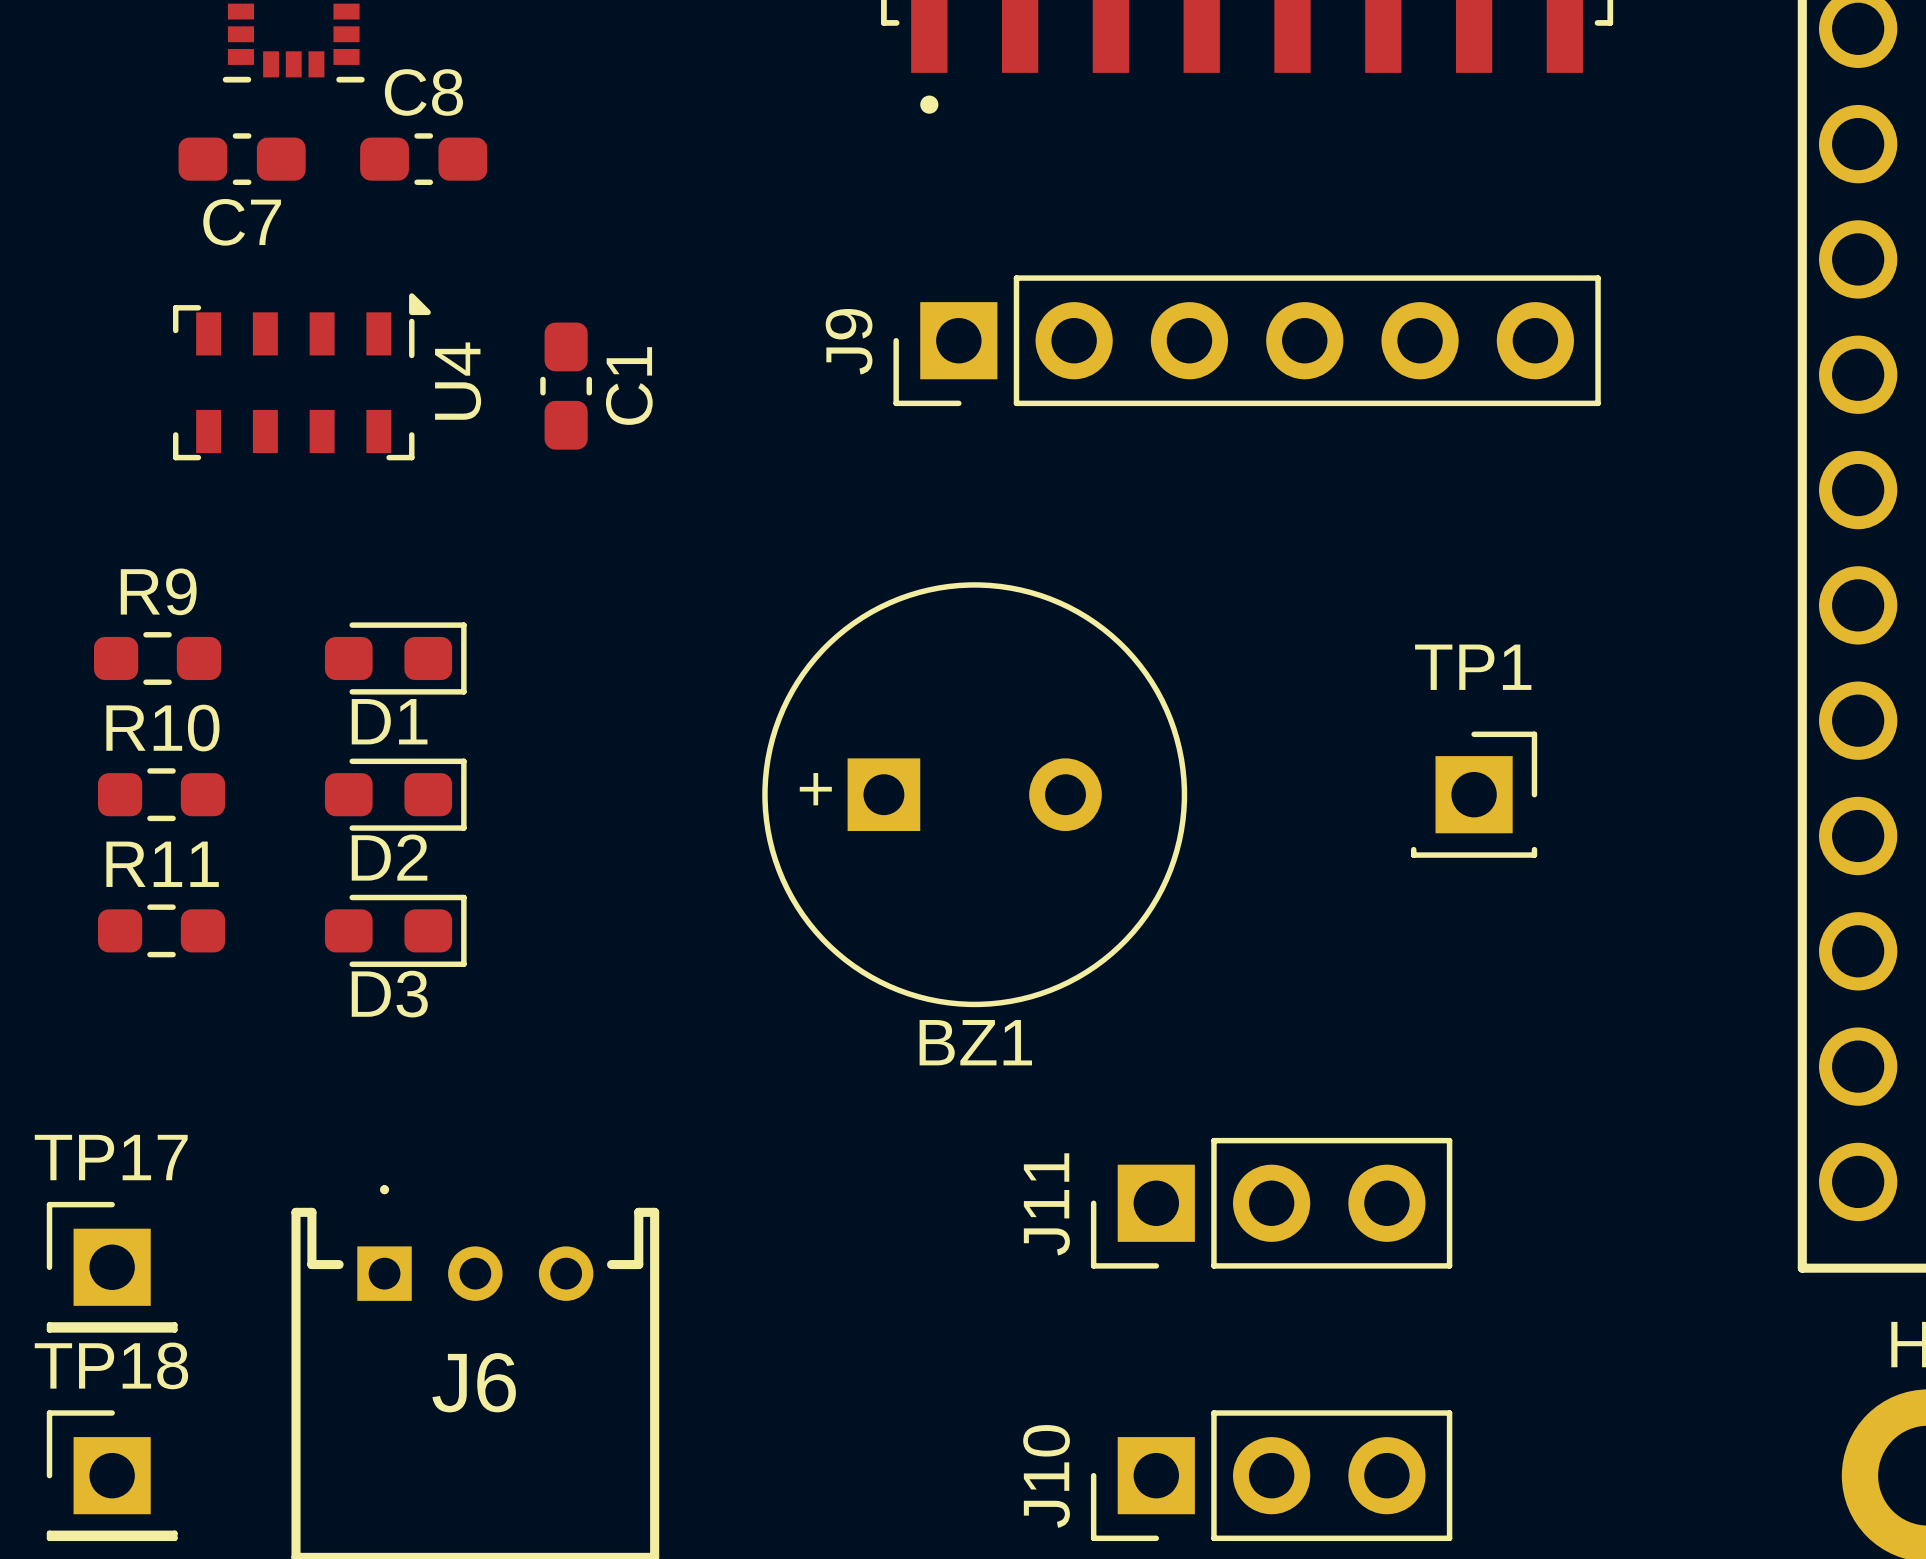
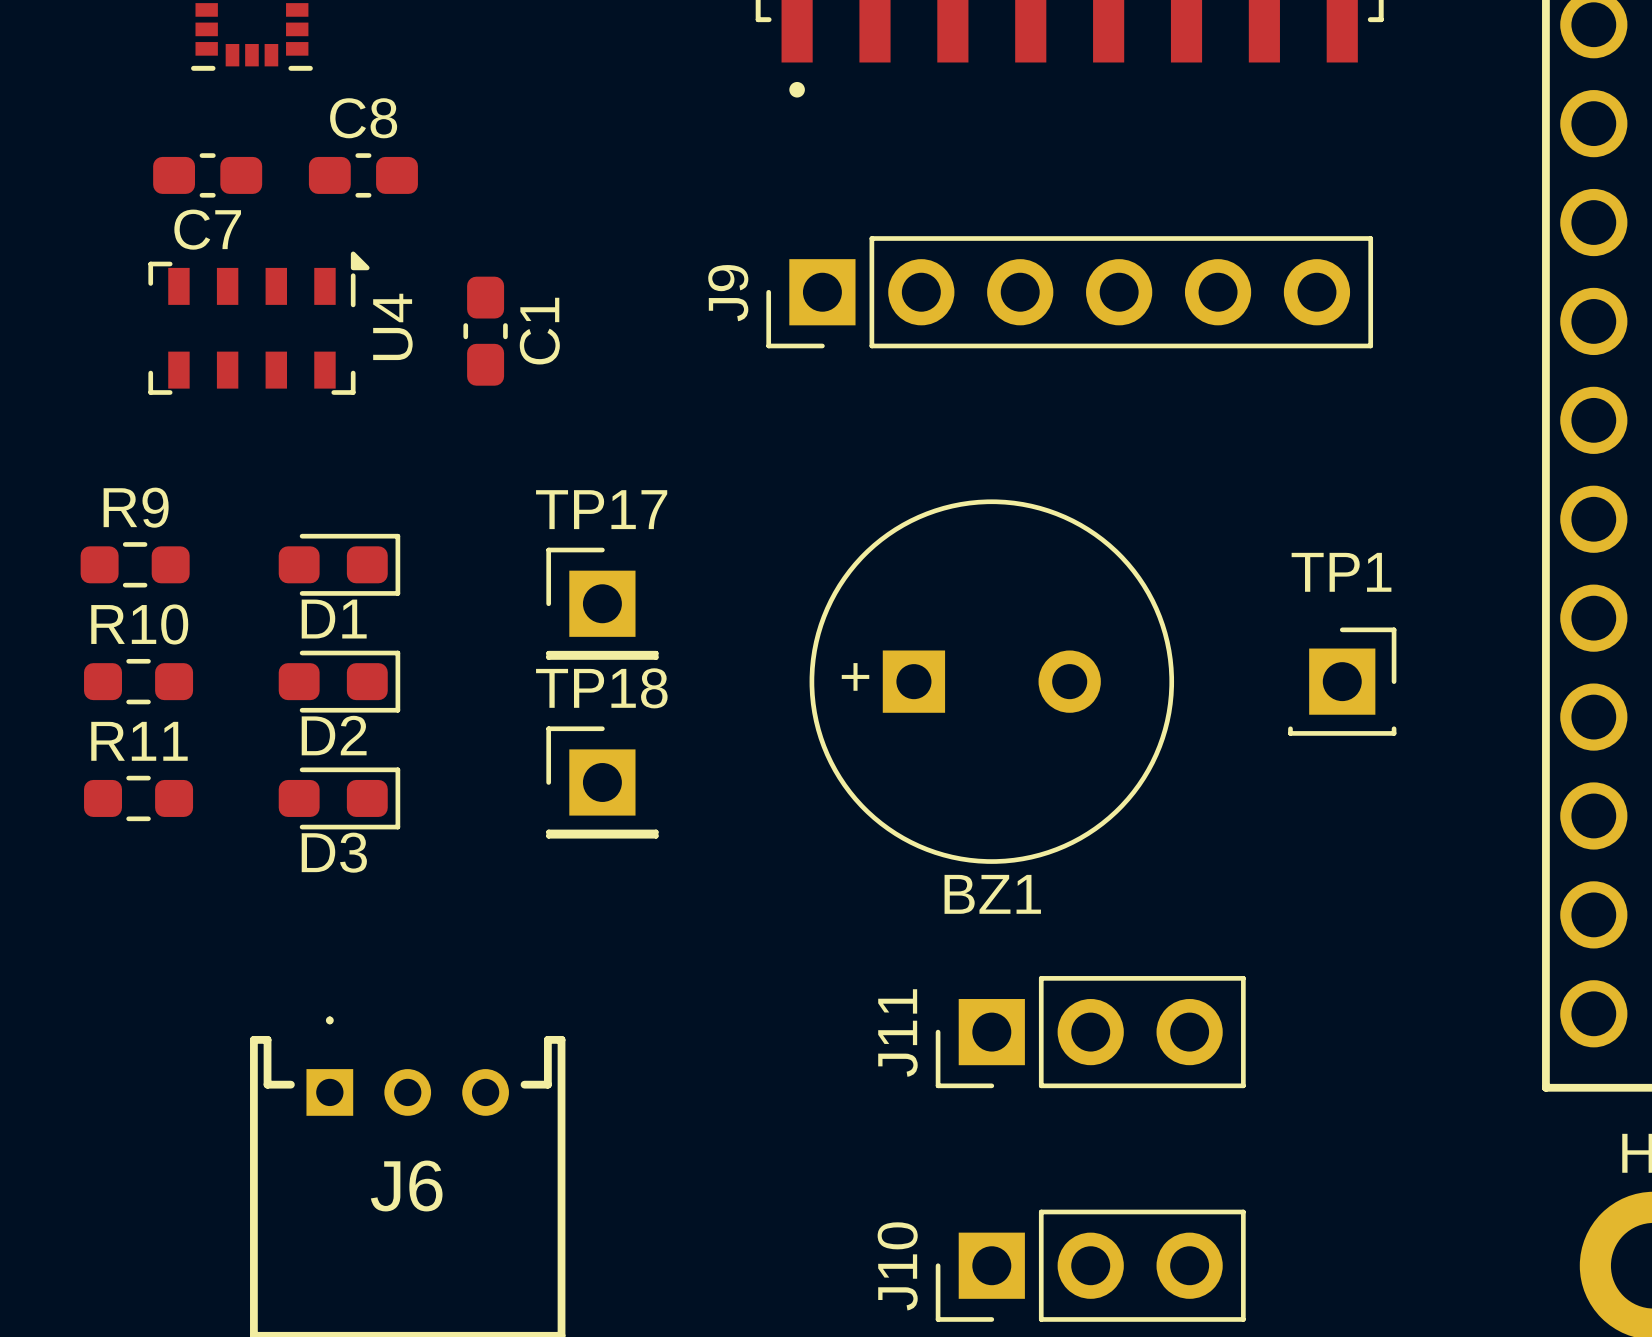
C7 position: (242, 159) -> (207, 175)
C8 position: (423, 159) -> (363, 175)
BZ1 position: (974, 794) -> (991, 681)
TP1 position: (1474, 794) -> (1342, 681)
TP17 position: (112, 1267) -> (602, 603)
TP18 position: (112, 1475) -> (602, 782)

